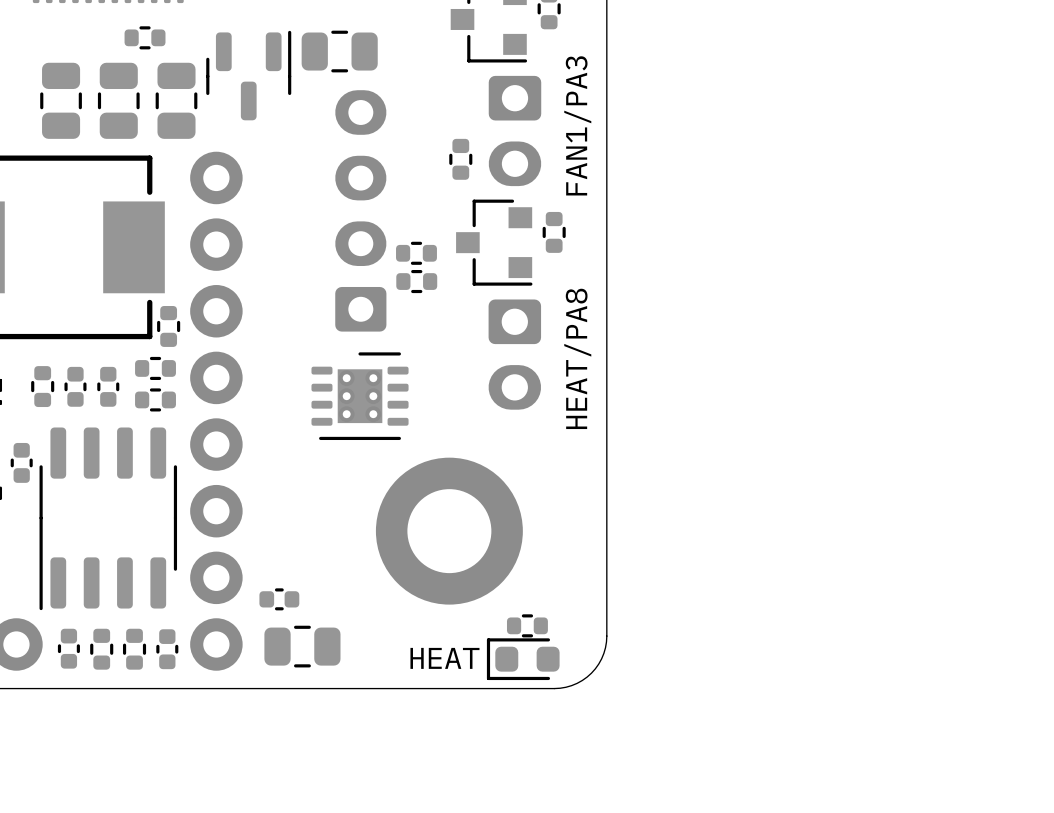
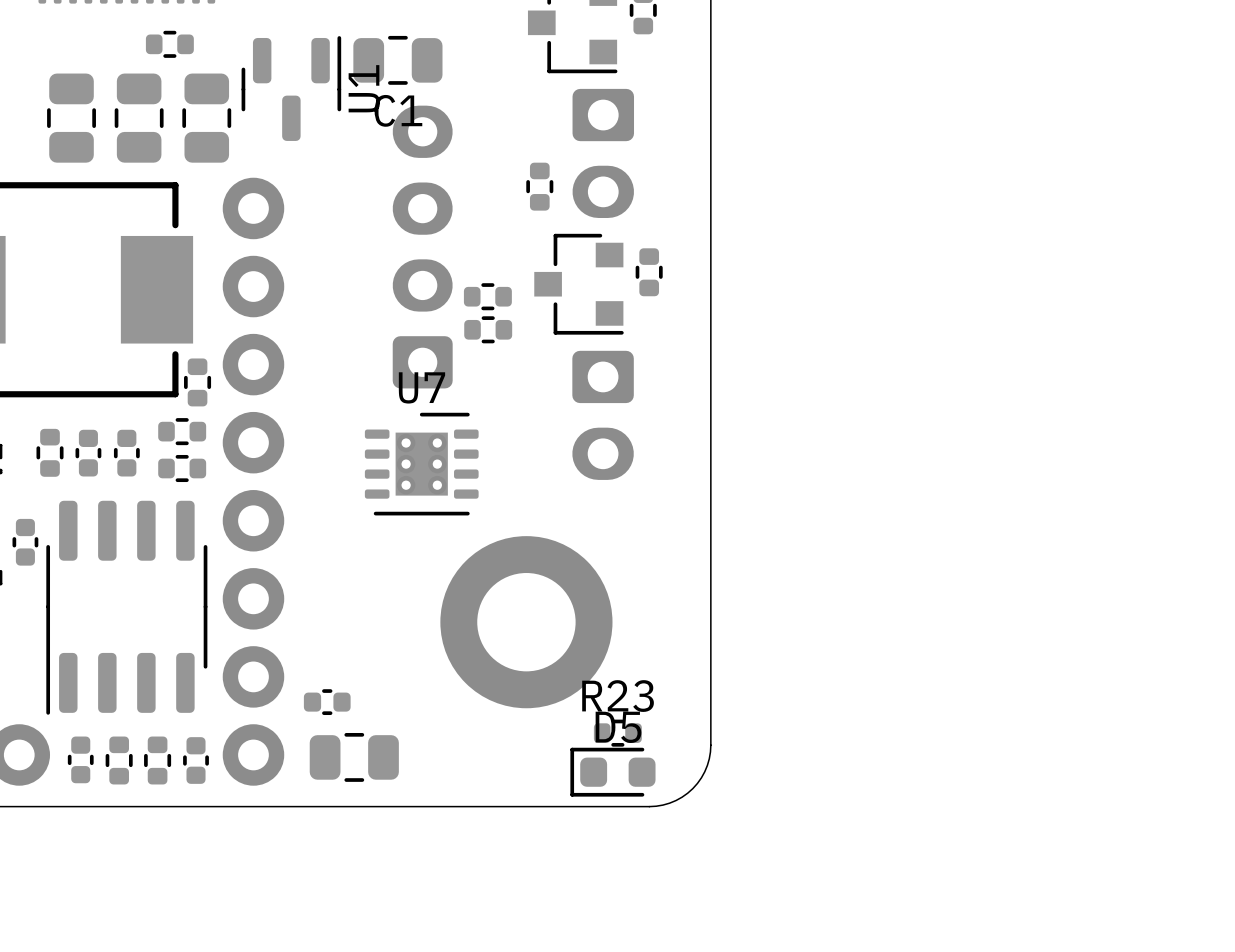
U1 name: none -> U1 (364, 88)
C1 name: none -> C1 (398, 110)
text: FAN1/PA3 (577, 125) -> none
U7 name: none -> U7 (421, 387)
text: HEAT/PA8 (577, 358) -> none
R23 name: none -> R23 (618, 696)
D5 name: none -> D5 (618, 727)
text: HEAT (444, 658) -> none

